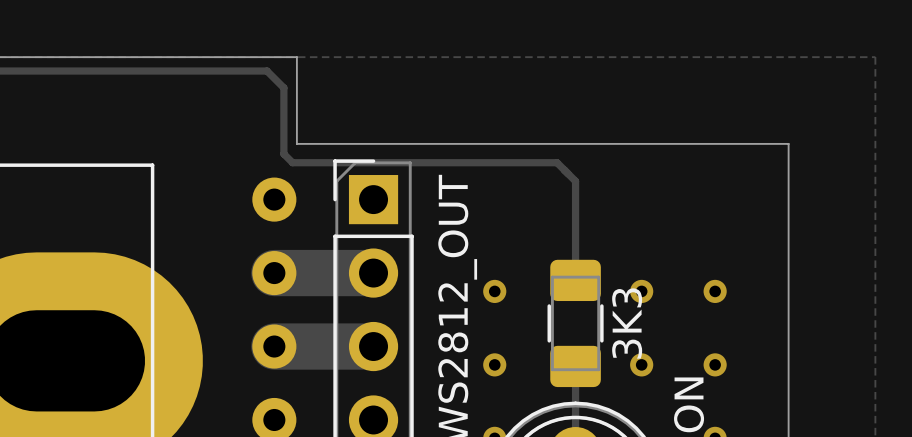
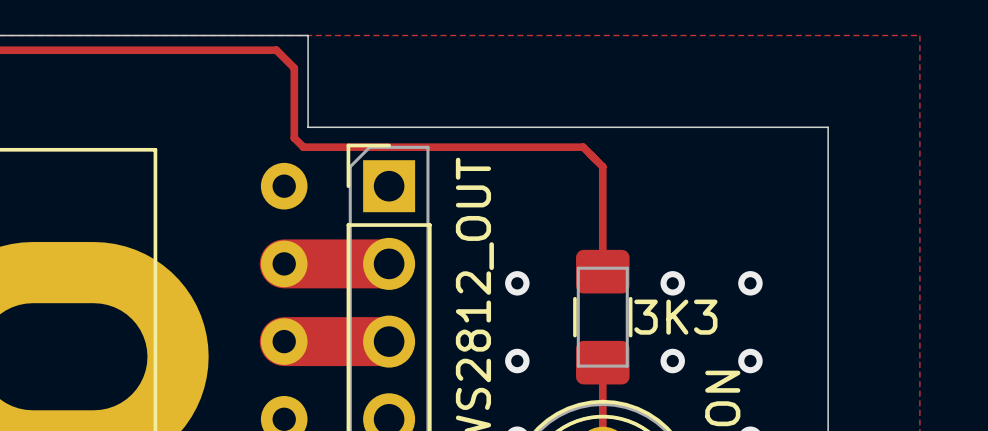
part value rotation: 0° (627, 323) -> 90° clockwise (675, 317)

